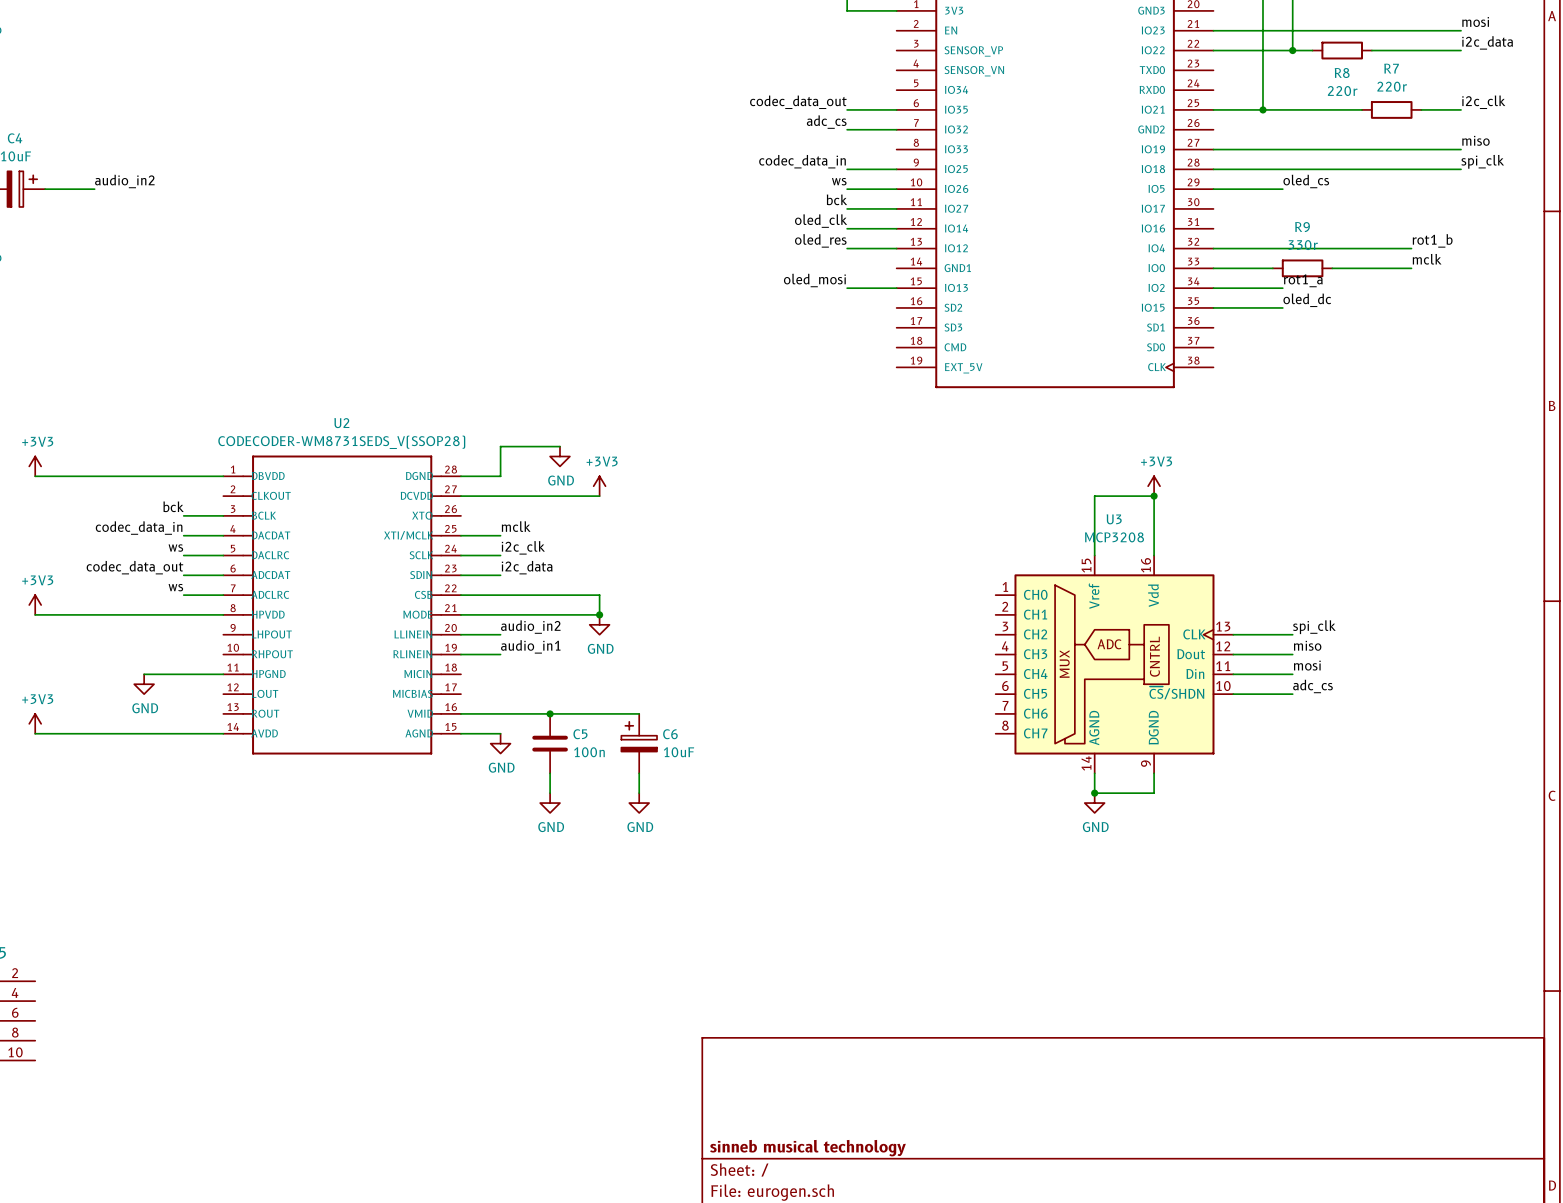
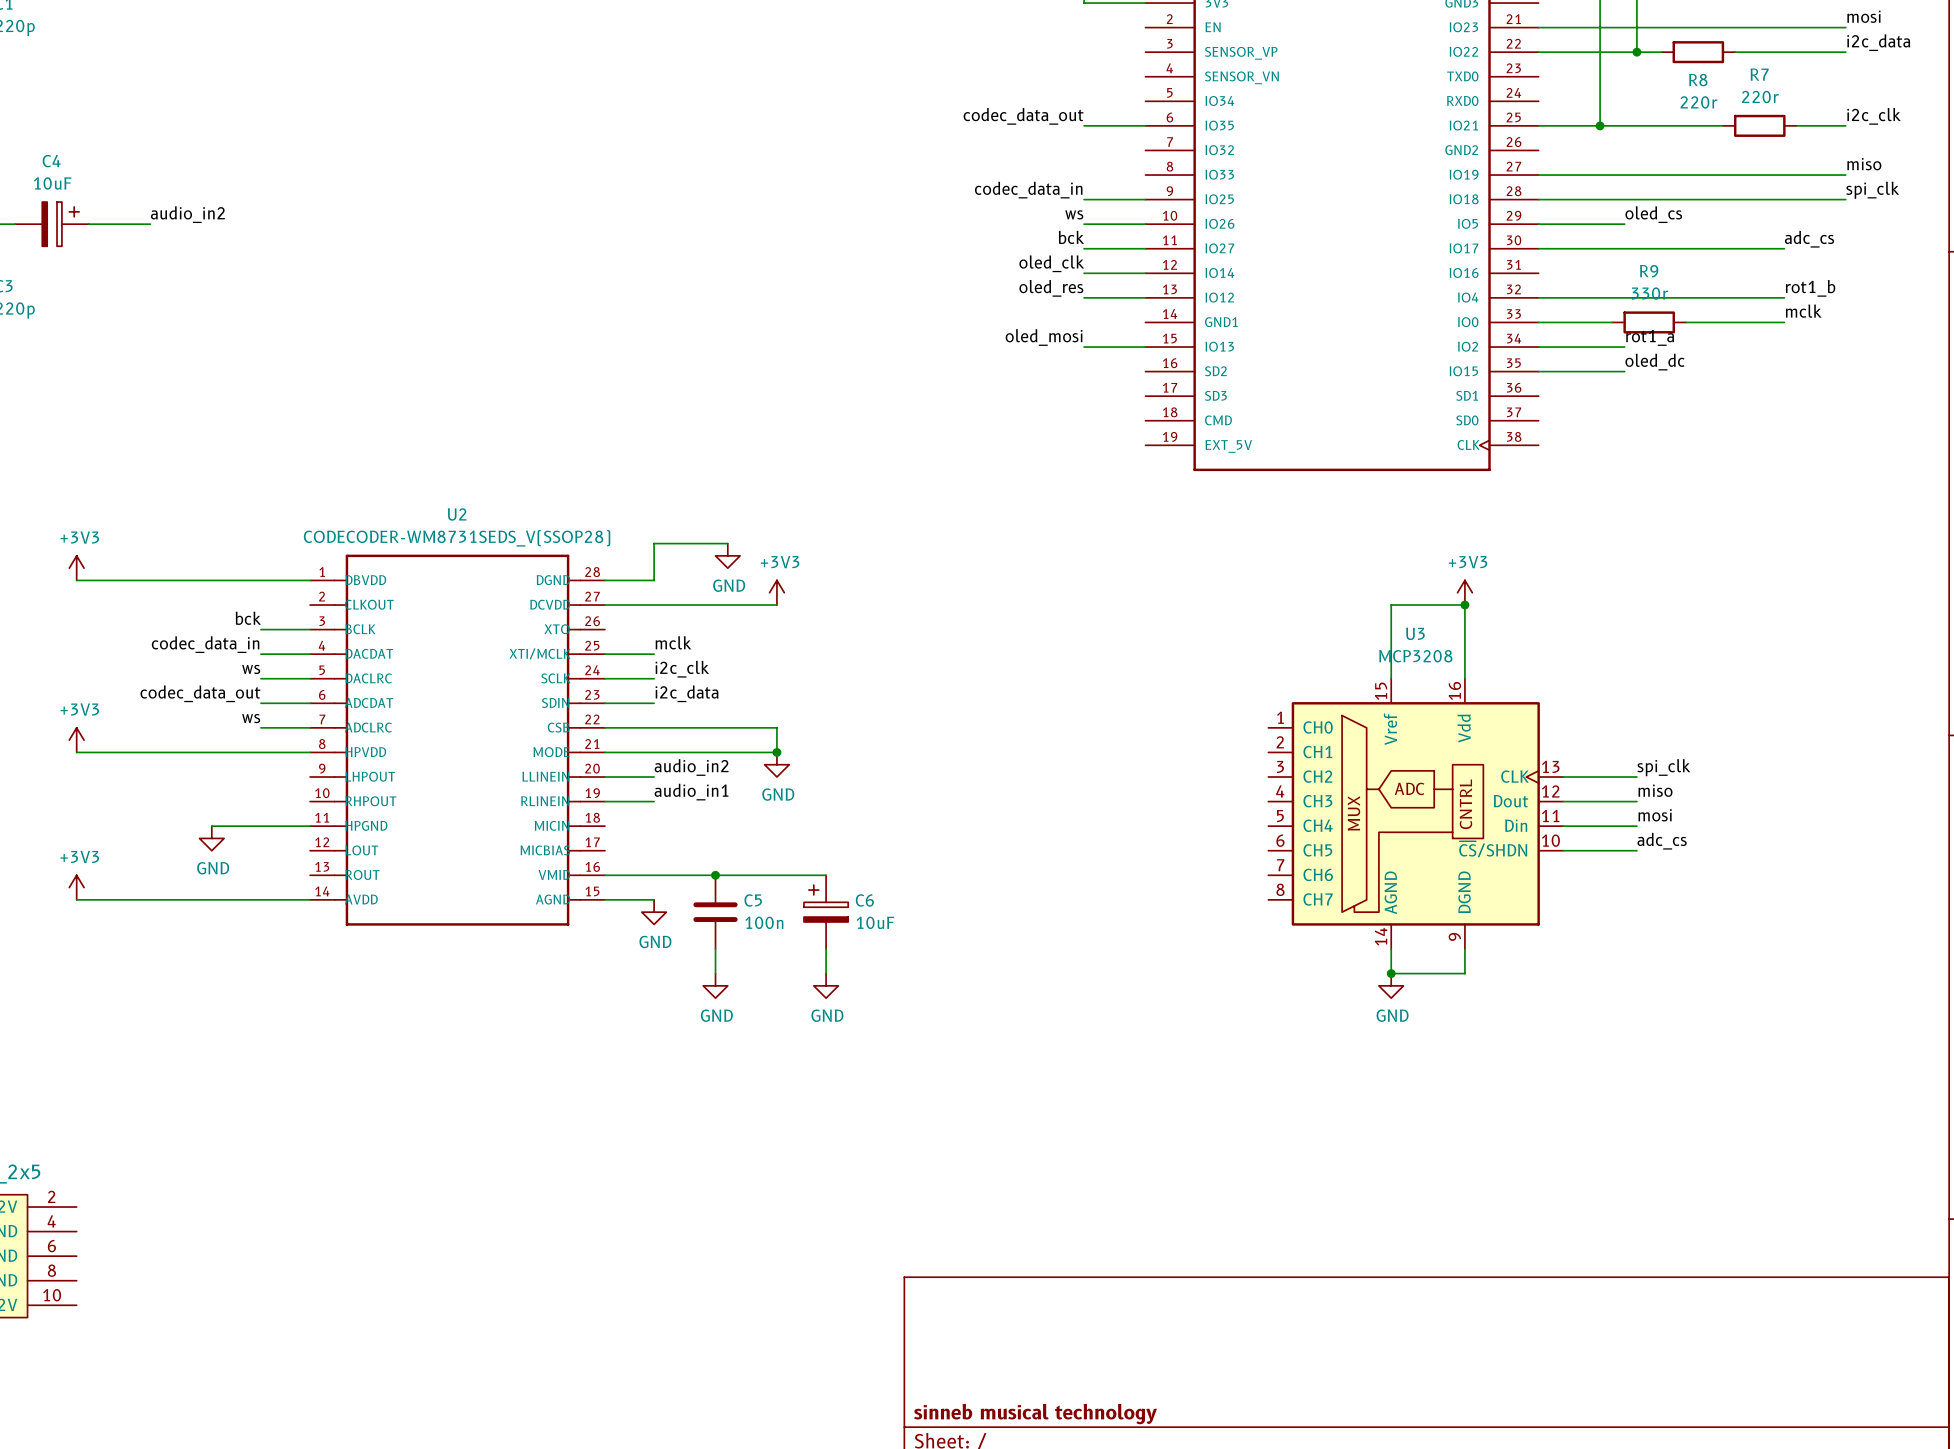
label: adc_cs (826, 122) -> none
wire: (847, 129) (896, 129) -> none
label: none -> adc_cs (1809, 239)
wire: none -> (1538, 248) (1784, 248)

